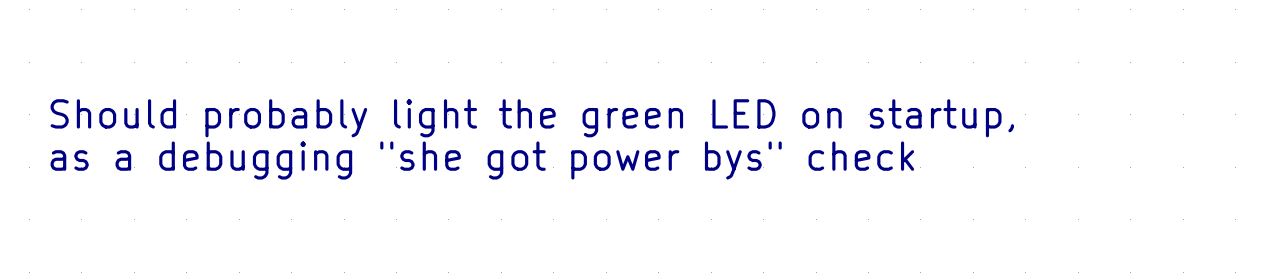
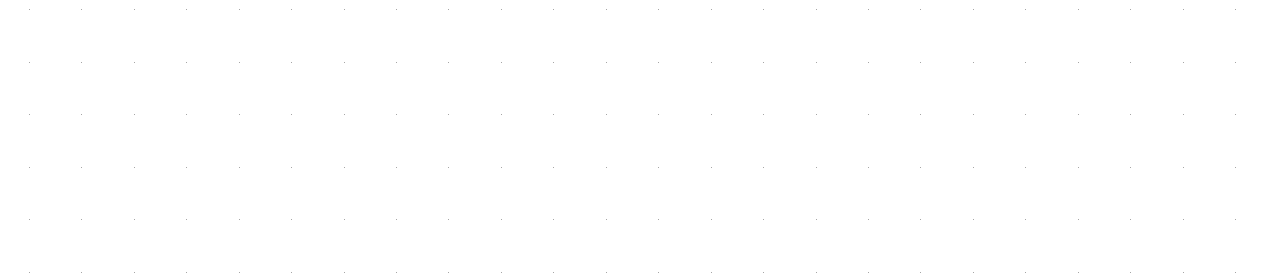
text: Should probably light the green LED on startup, (532, 118) -> none
text: as a debugging "she got power bys" check (482, 160) -> none

